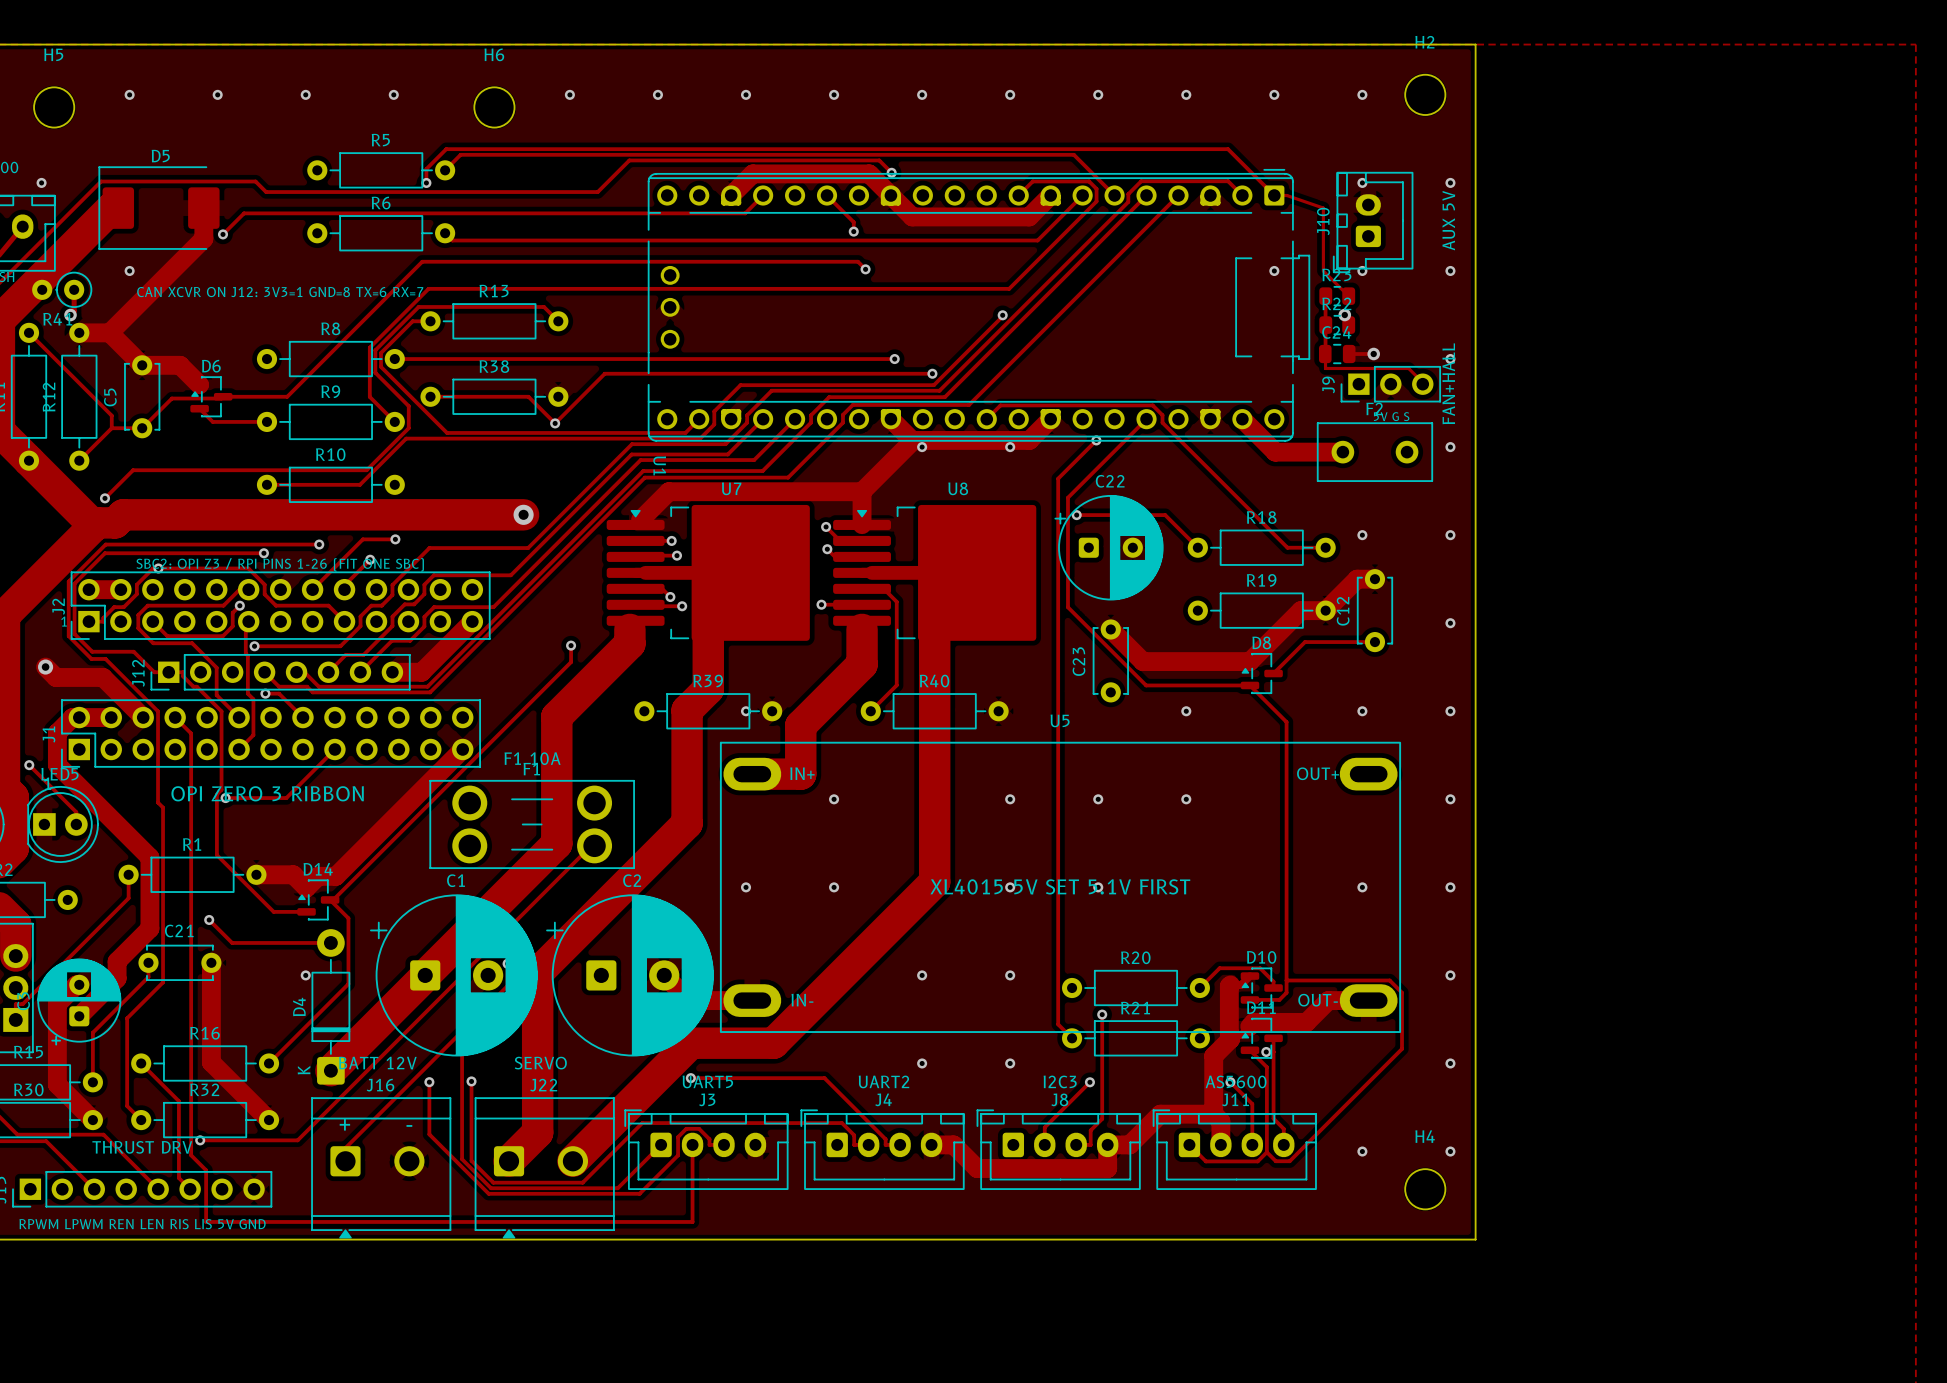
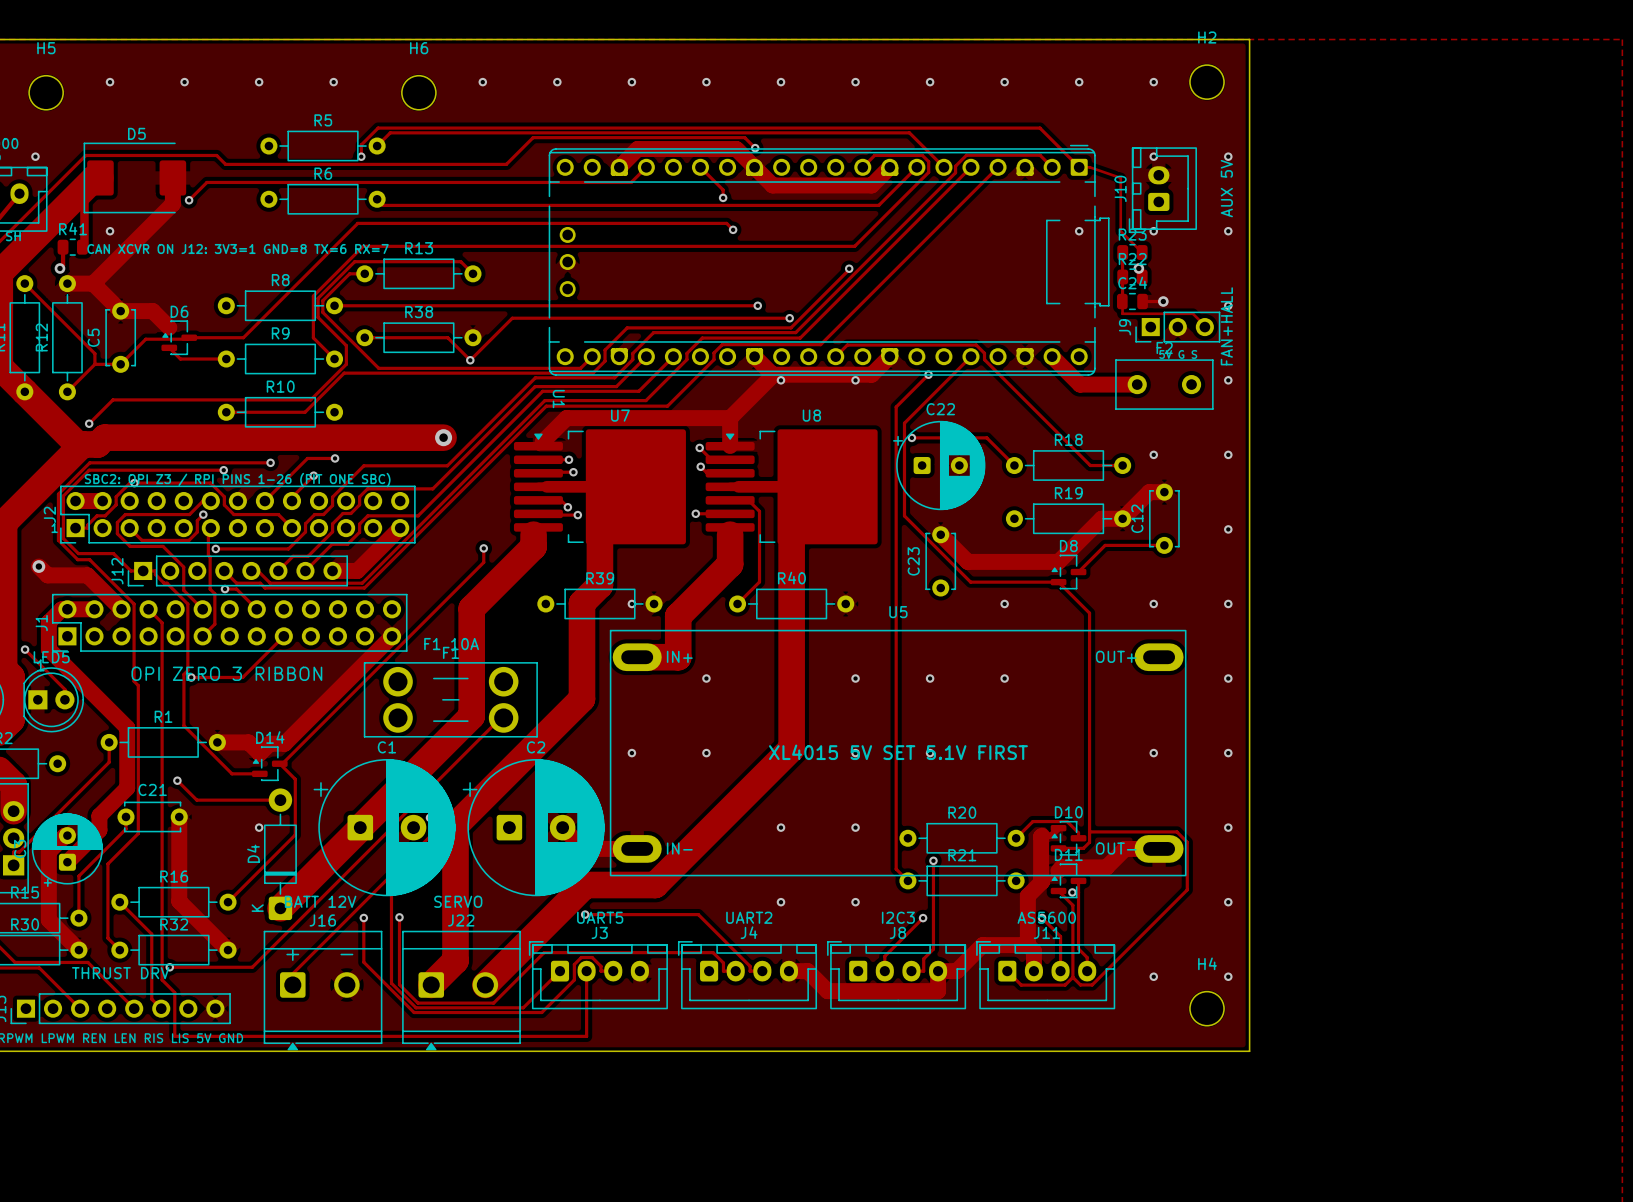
track: none -> (84, 177) (84, 247)
R41 footprint: [32, 271, 93, 308] -> [57, 238, 88, 256]
R41 name position: R41 (57, 319) -> R41 (73, 228)

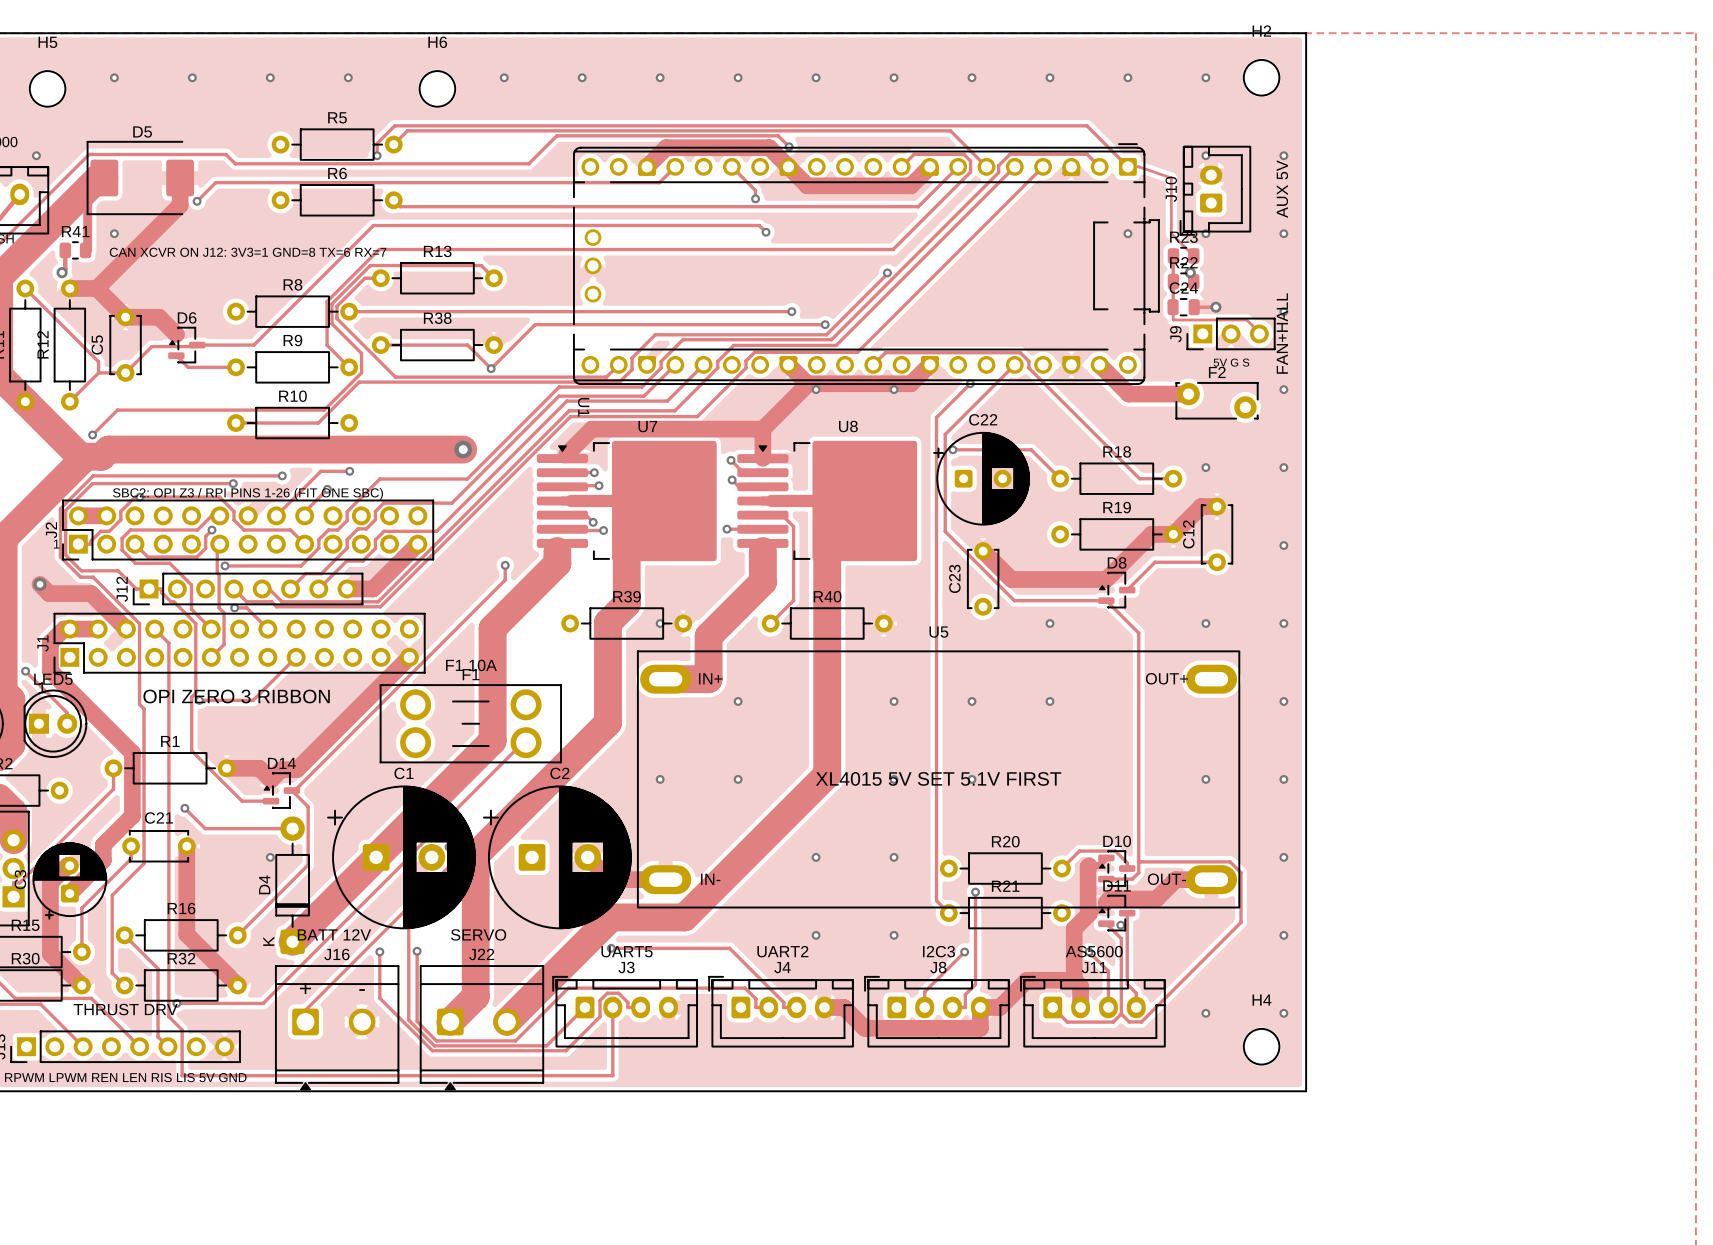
F2 footprint: [1115, 359, 1214, 410] -> [1175, 382, 1259, 420]

